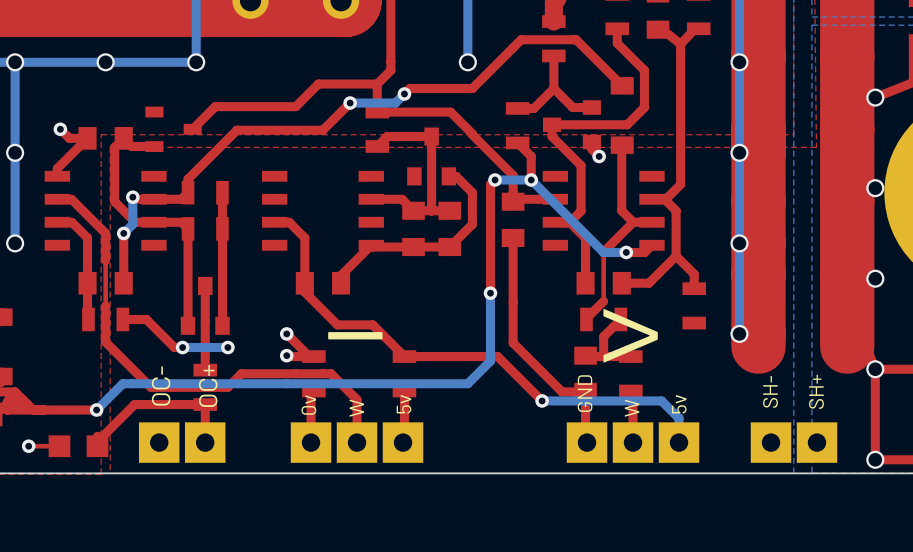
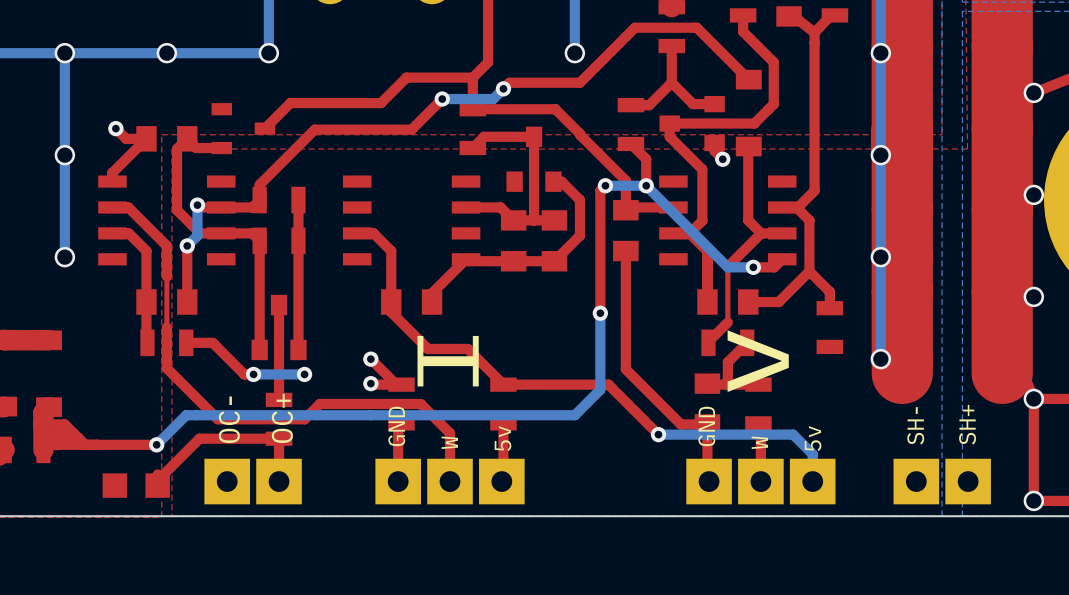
text: 0v (308, 405) -> GND (396, 426)
via: (28, 446) -> none
top track: (59, 446) (28, 446) -> none

